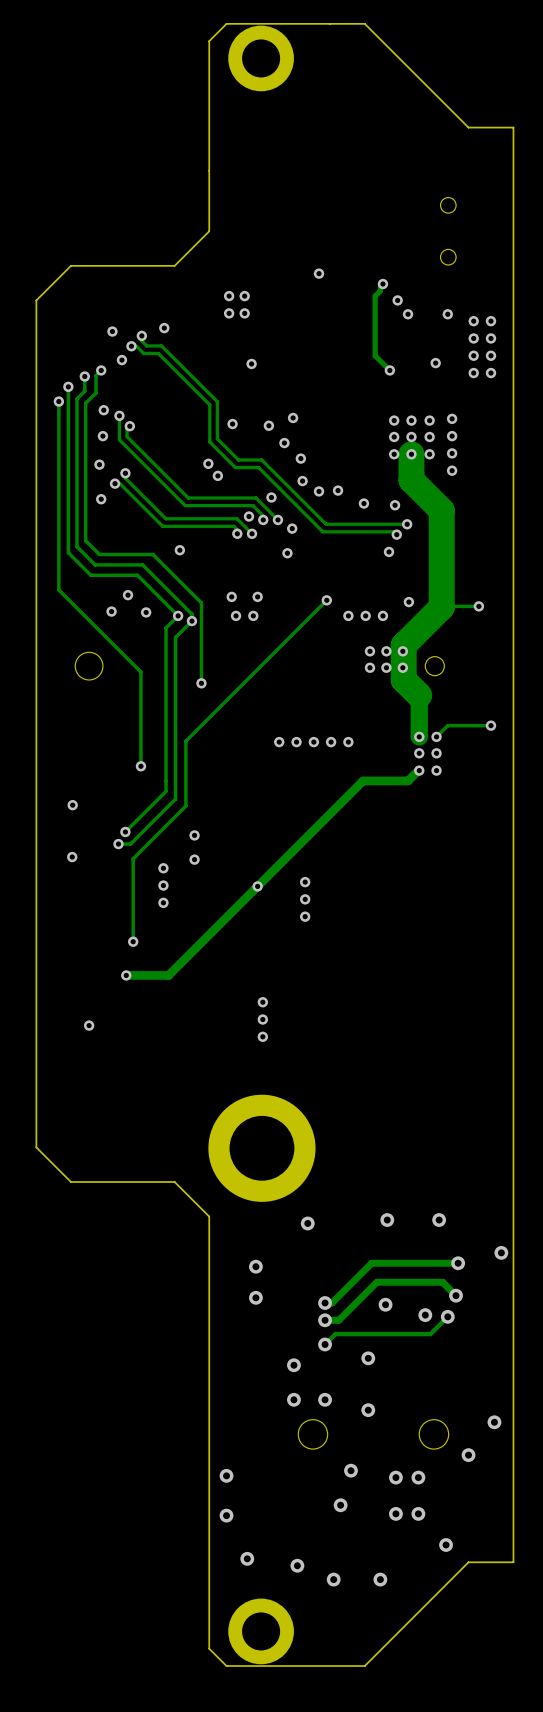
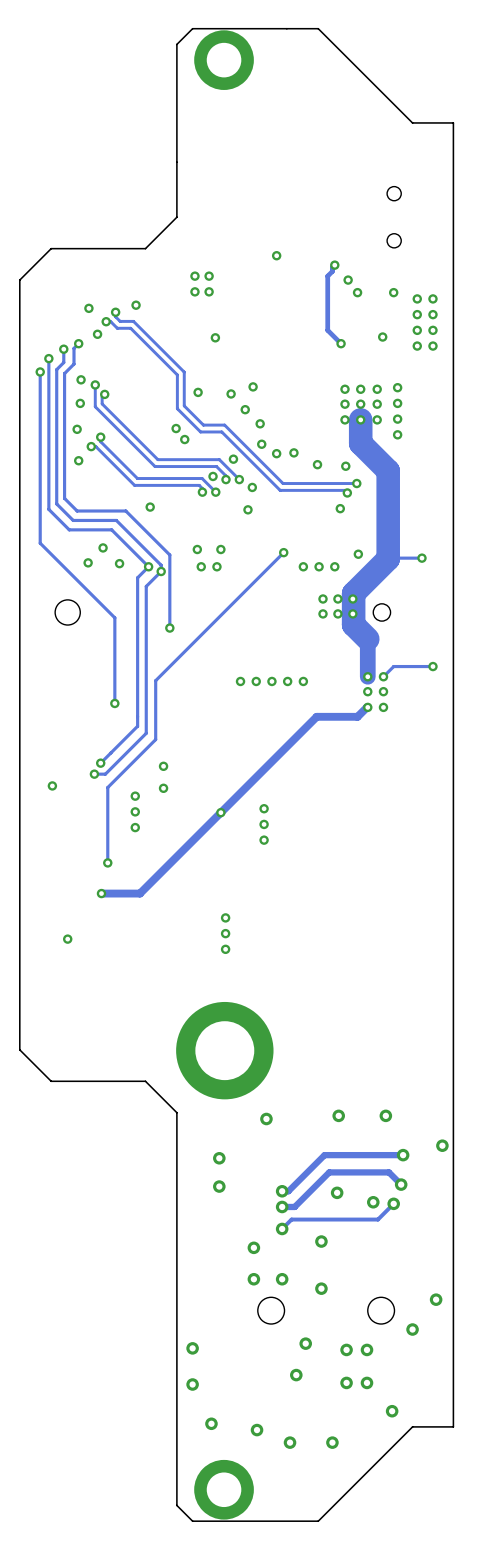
via: (72, 805) -> none

